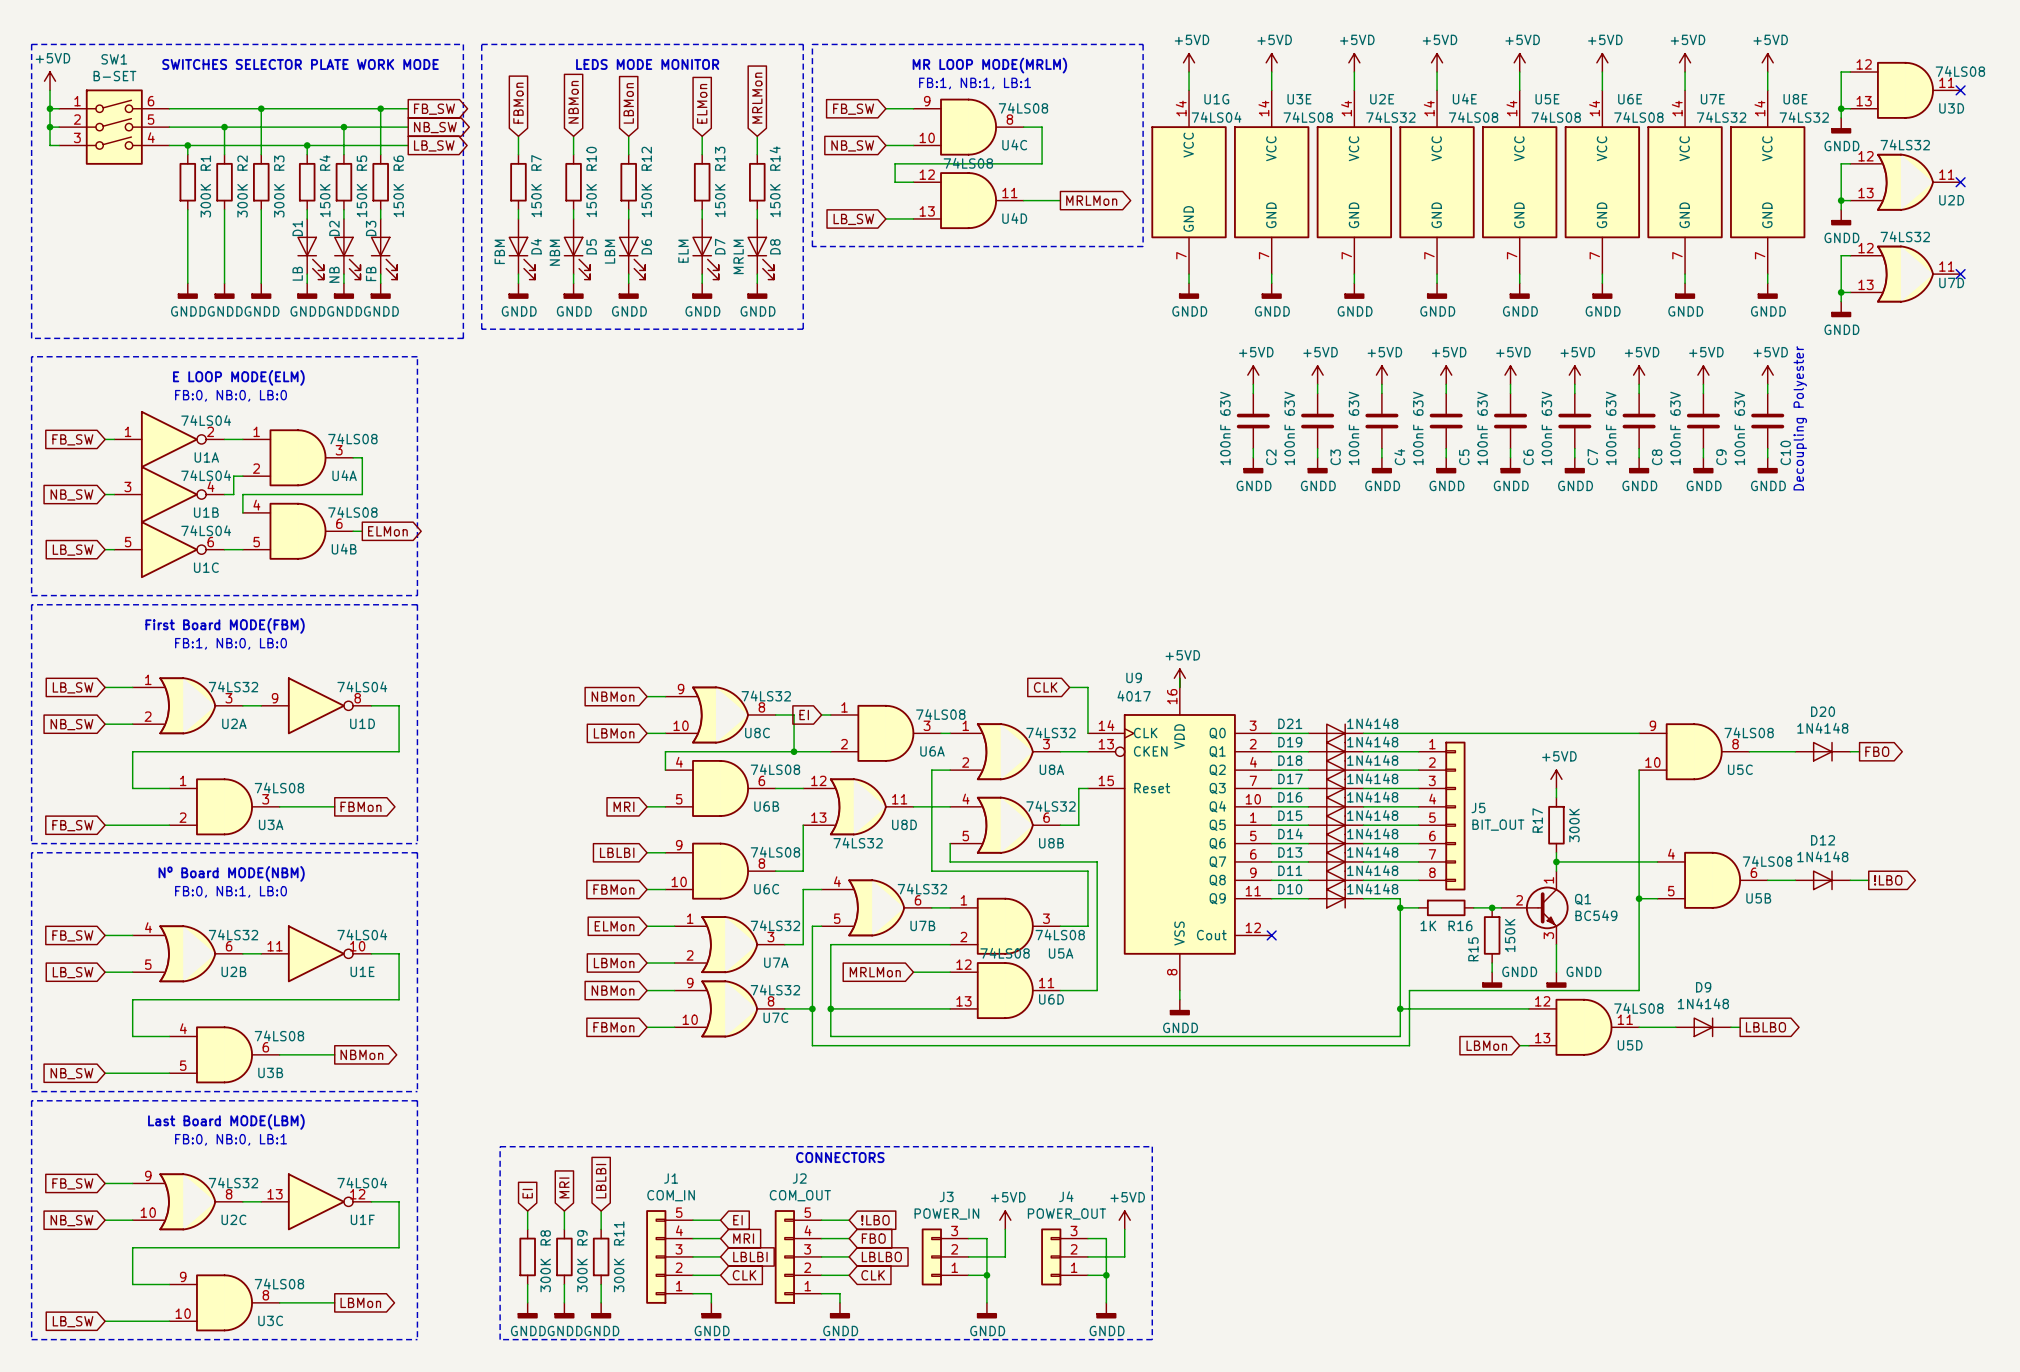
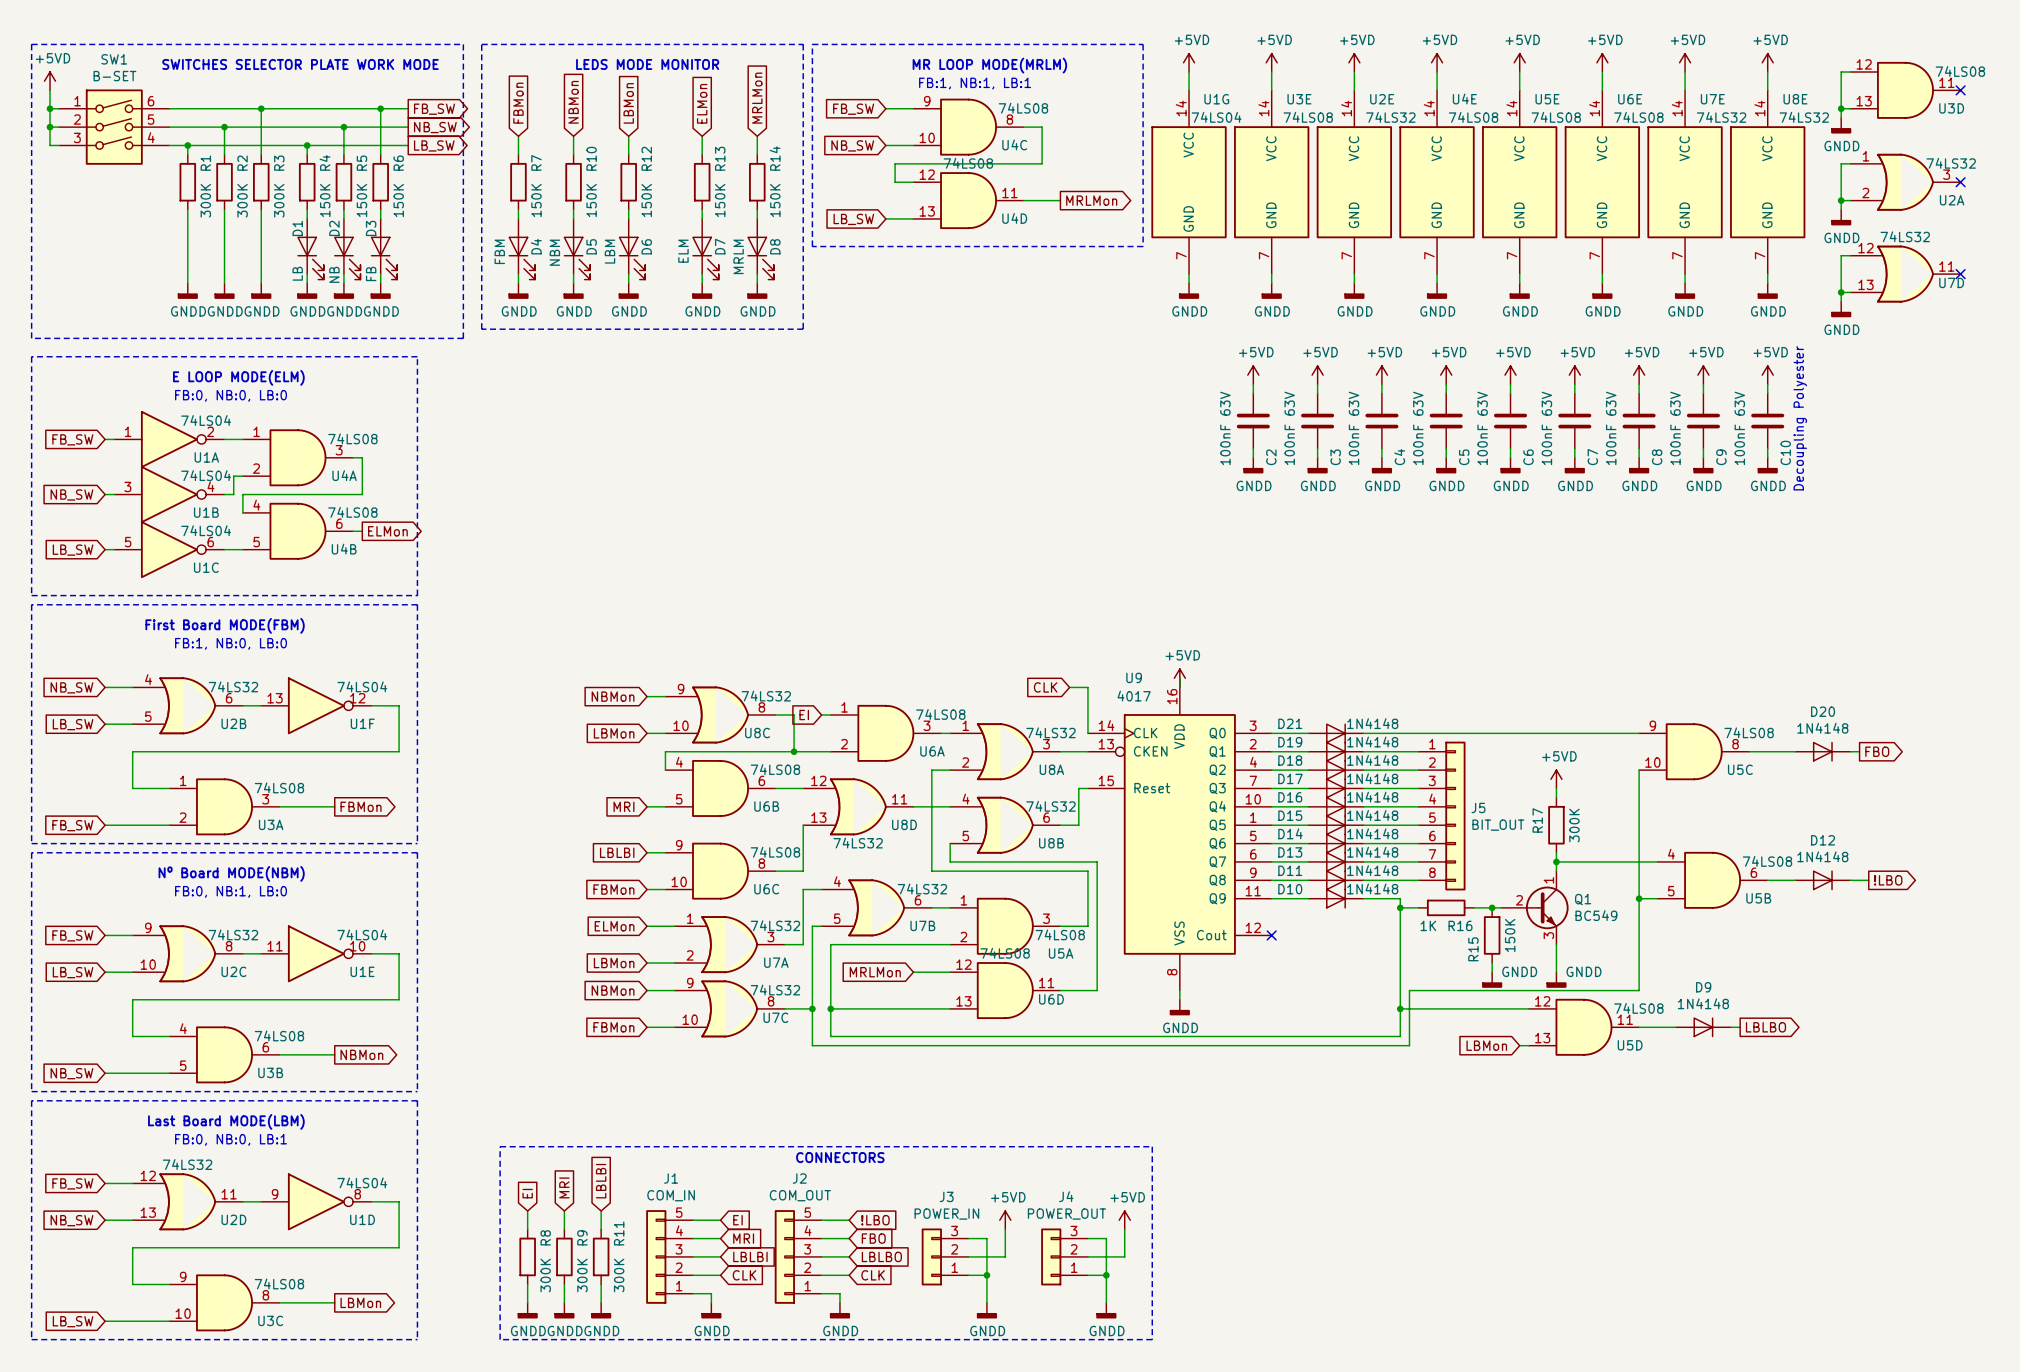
U2D position: (1905, 182) -> (187, 1201)
global label: LB_SW (73, 687) -> NB_SW (71, 687)
U2A position: (187, 705) -> (1905, 182)
U1D position: (316, 705) -> (316, 1201)
global label: NB_SW (71, 724) -> LB_SW (73, 724)
U2B position: (187, 953) -> (187, 705)
U2C position: (187, 1201) -> (187, 953)
U1F position: (316, 1201) -> (316, 705)

